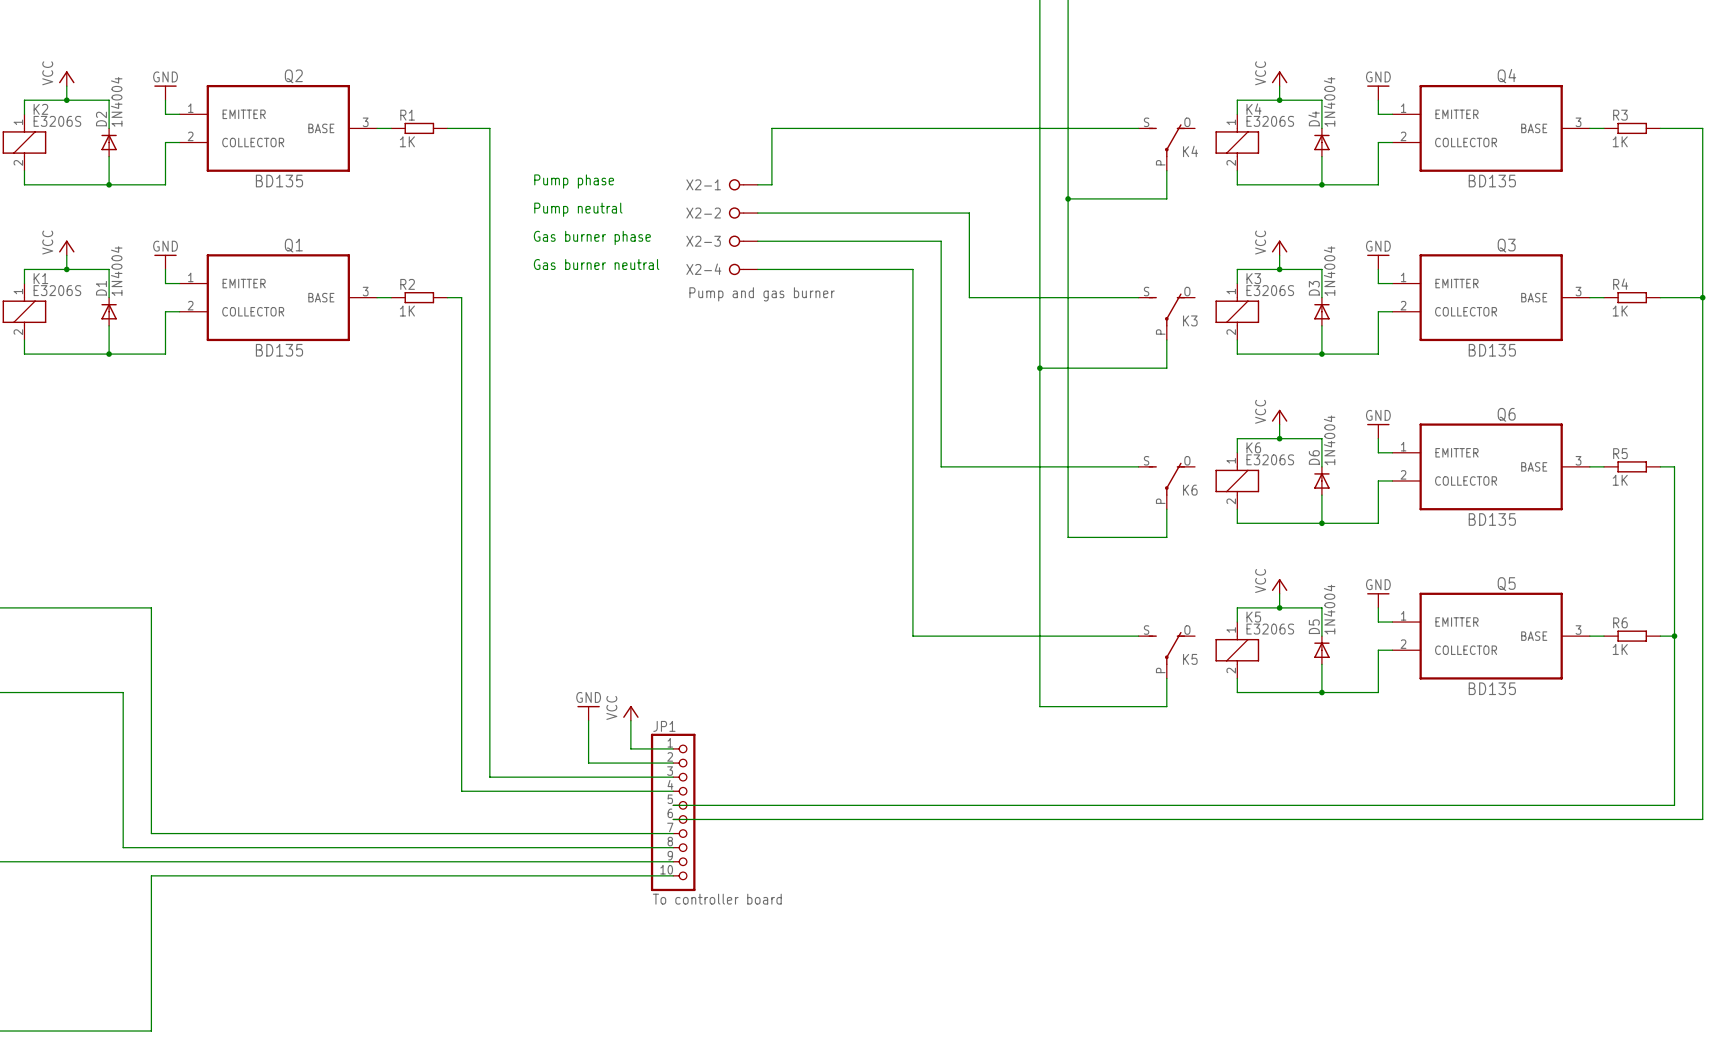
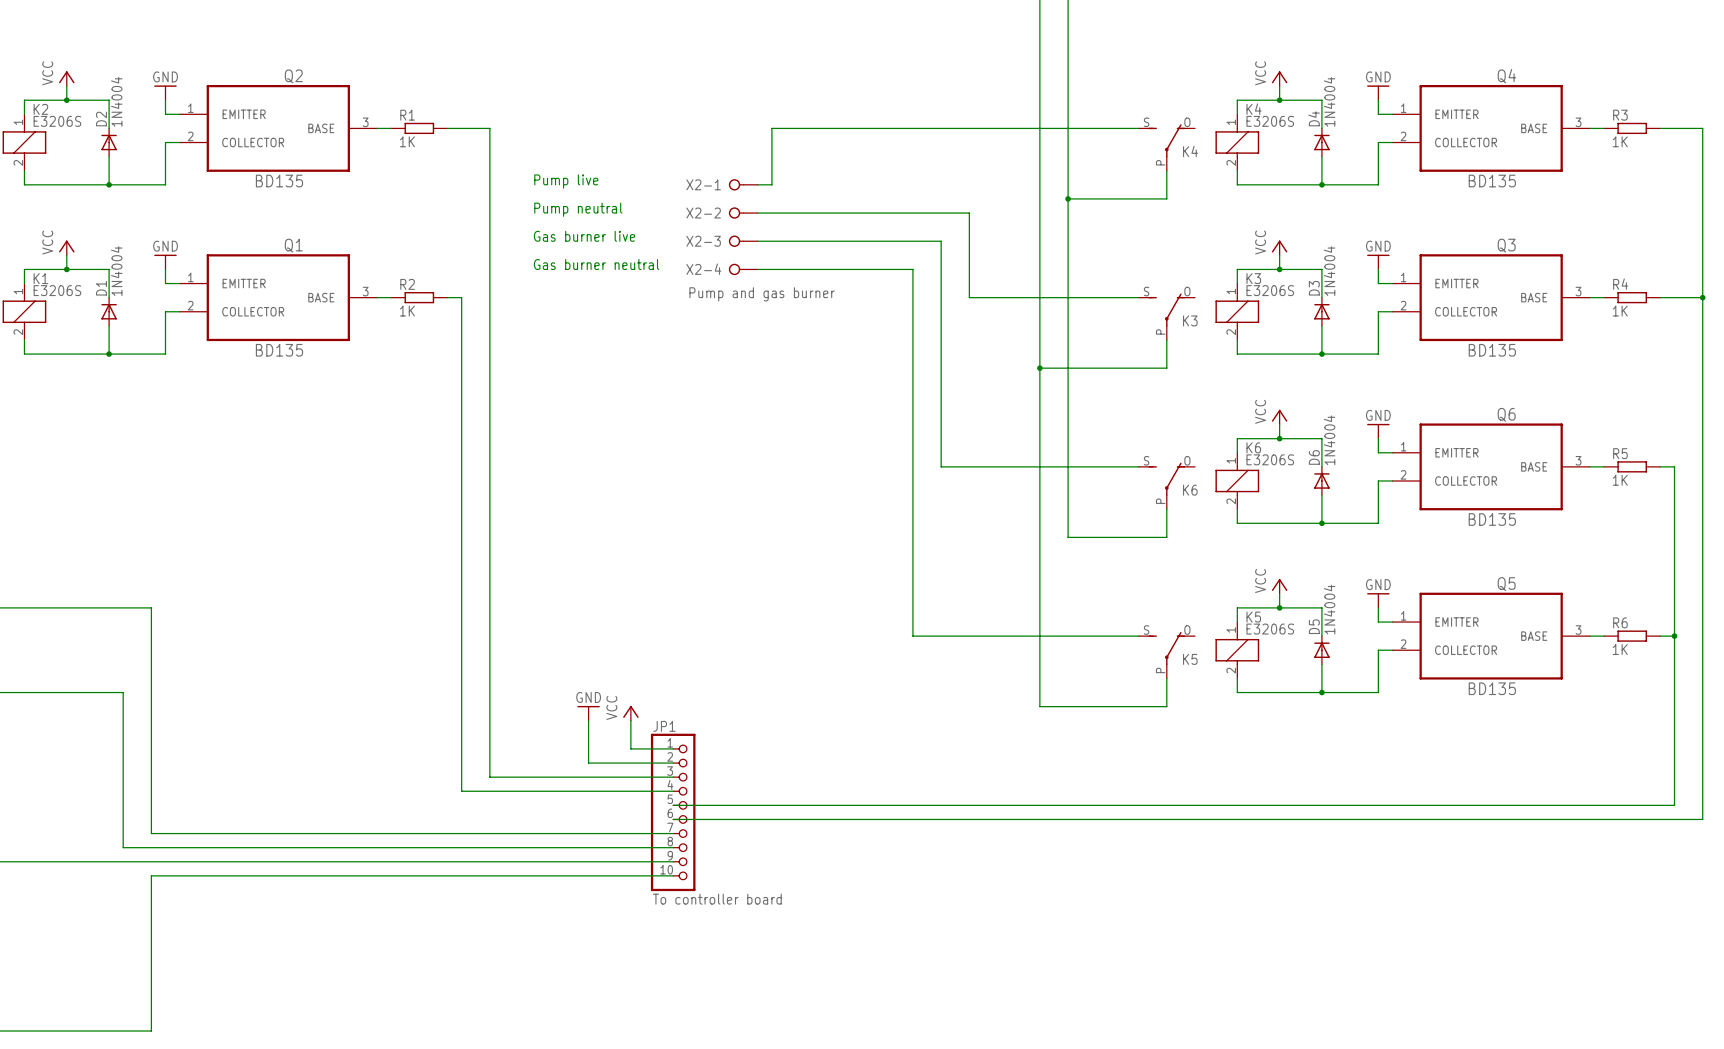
text: Pump phase (574, 181) -> Pump live (566, 181)
text: Gas burner phase (592, 237) -> Gas burner live (584, 236)

